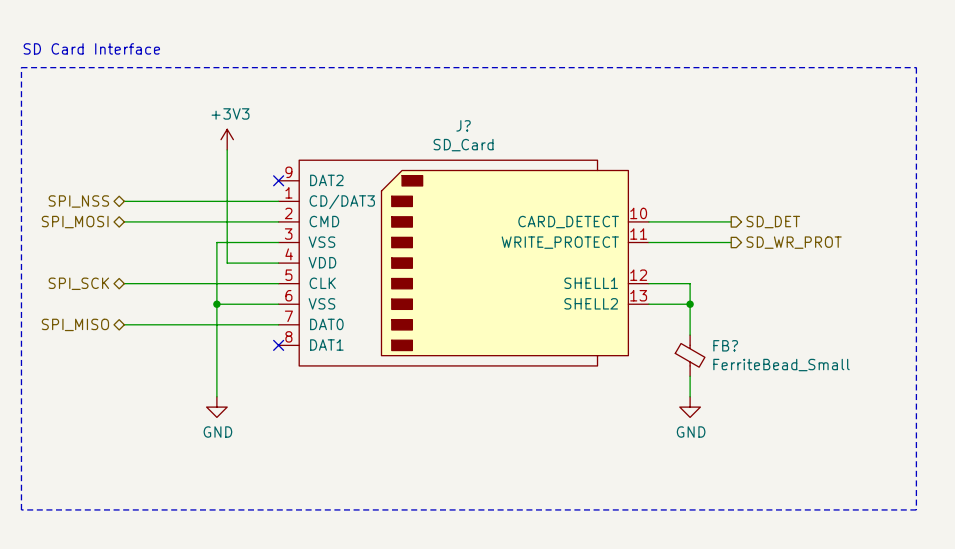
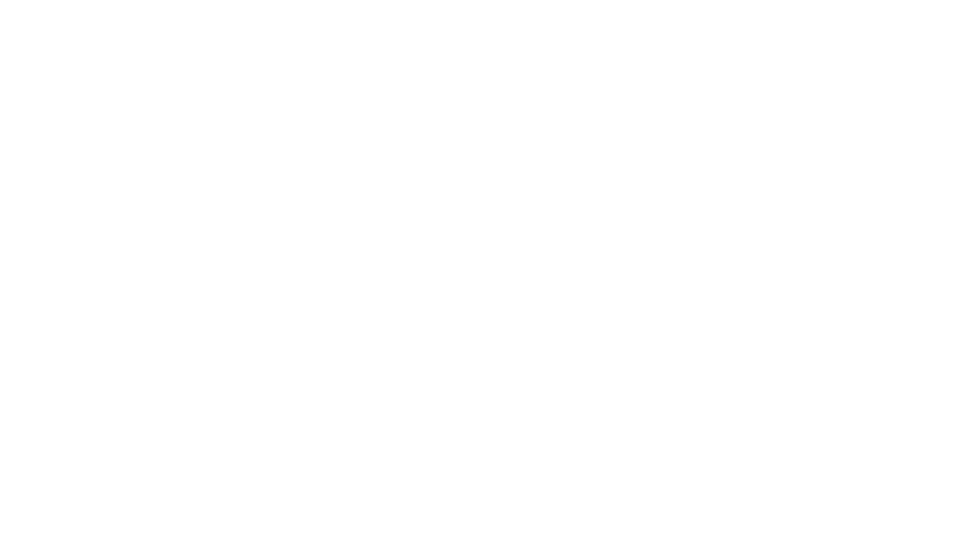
text: SD Card Interface (91, 48) -> none
line: (21, 67) (21, 509) (916, 509) (916, 67) (21, 67) -> none
power symbol: +3V3 (227, 139) -> none
wire: (227, 149) (227, 263) (278, 263) -> none
no-connect mark: (278, 180) -> none
hierarchical label: SPI_NSS (78, 201) -> none
wire: (124, 201) (278, 201) -> none
wire: (124, 221) (278, 221) -> none
wire: (648, 221) (731, 221) -> none
hierarchical label: SPI_MOSI (75, 222) -> none
hierarchical label: SD_DET (773, 222) -> none
wire: (278, 242) (216, 242) (216, 396) -> none
wire: (648, 242) (731, 242) -> none
hierarchical label: SD_WR_PROT (794, 242) -> none
J?: SD_Card (463, 263) -> none
hierarchical label: SPI_SCK (78, 283) -> none
wire: (124, 283) (278, 283) -> none
wire: (648, 283) (690, 283) (690, 335) -> none
wire: (216, 304) (278, 304) -> none
junction: (216, 304) -> none
wire: (648, 304) (690, 304) -> none
junction: (690, 304) -> none
hierarchical label: SPI_MISO (75, 324) -> none
wire: (124, 324) (278, 324) -> none
no-connect mark: (278, 345) -> none
FB?: FerriteBead_Small (690, 355) -> none
wire: (690, 376) (690, 396) -> none
power symbol: GND (216, 407) -> none
power symbol: GND (690, 407) -> none

